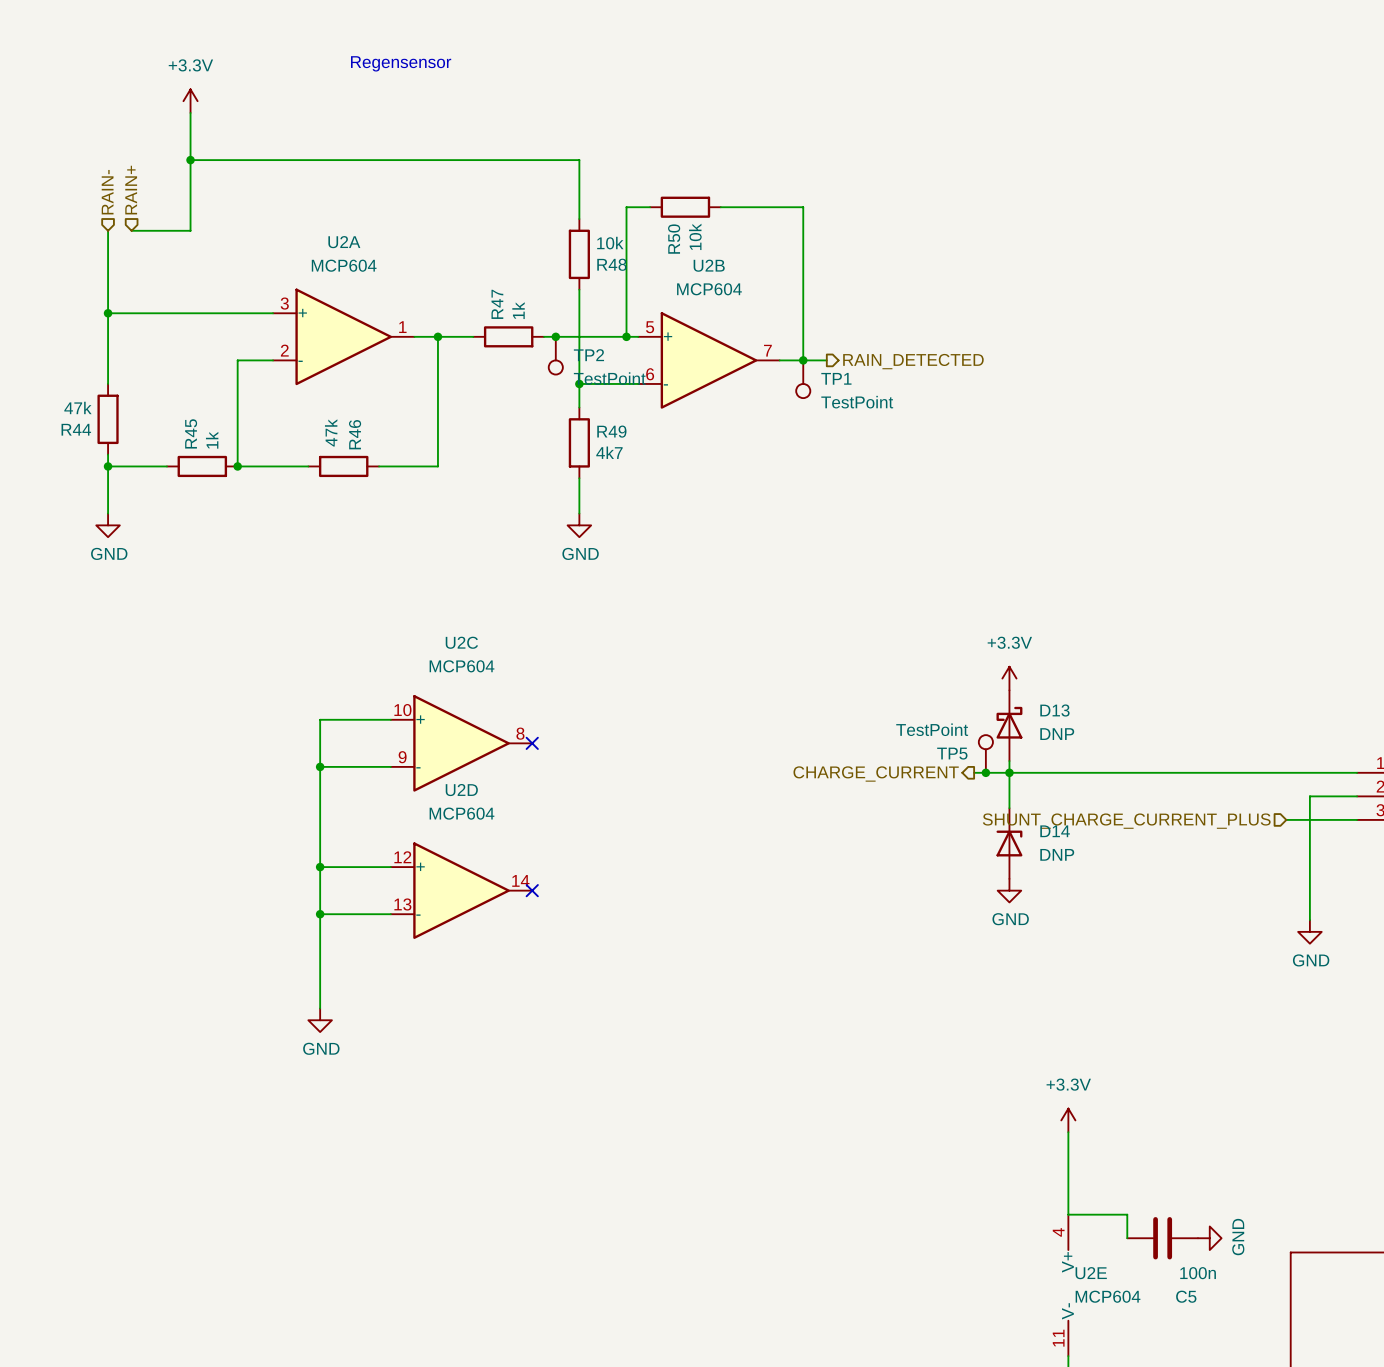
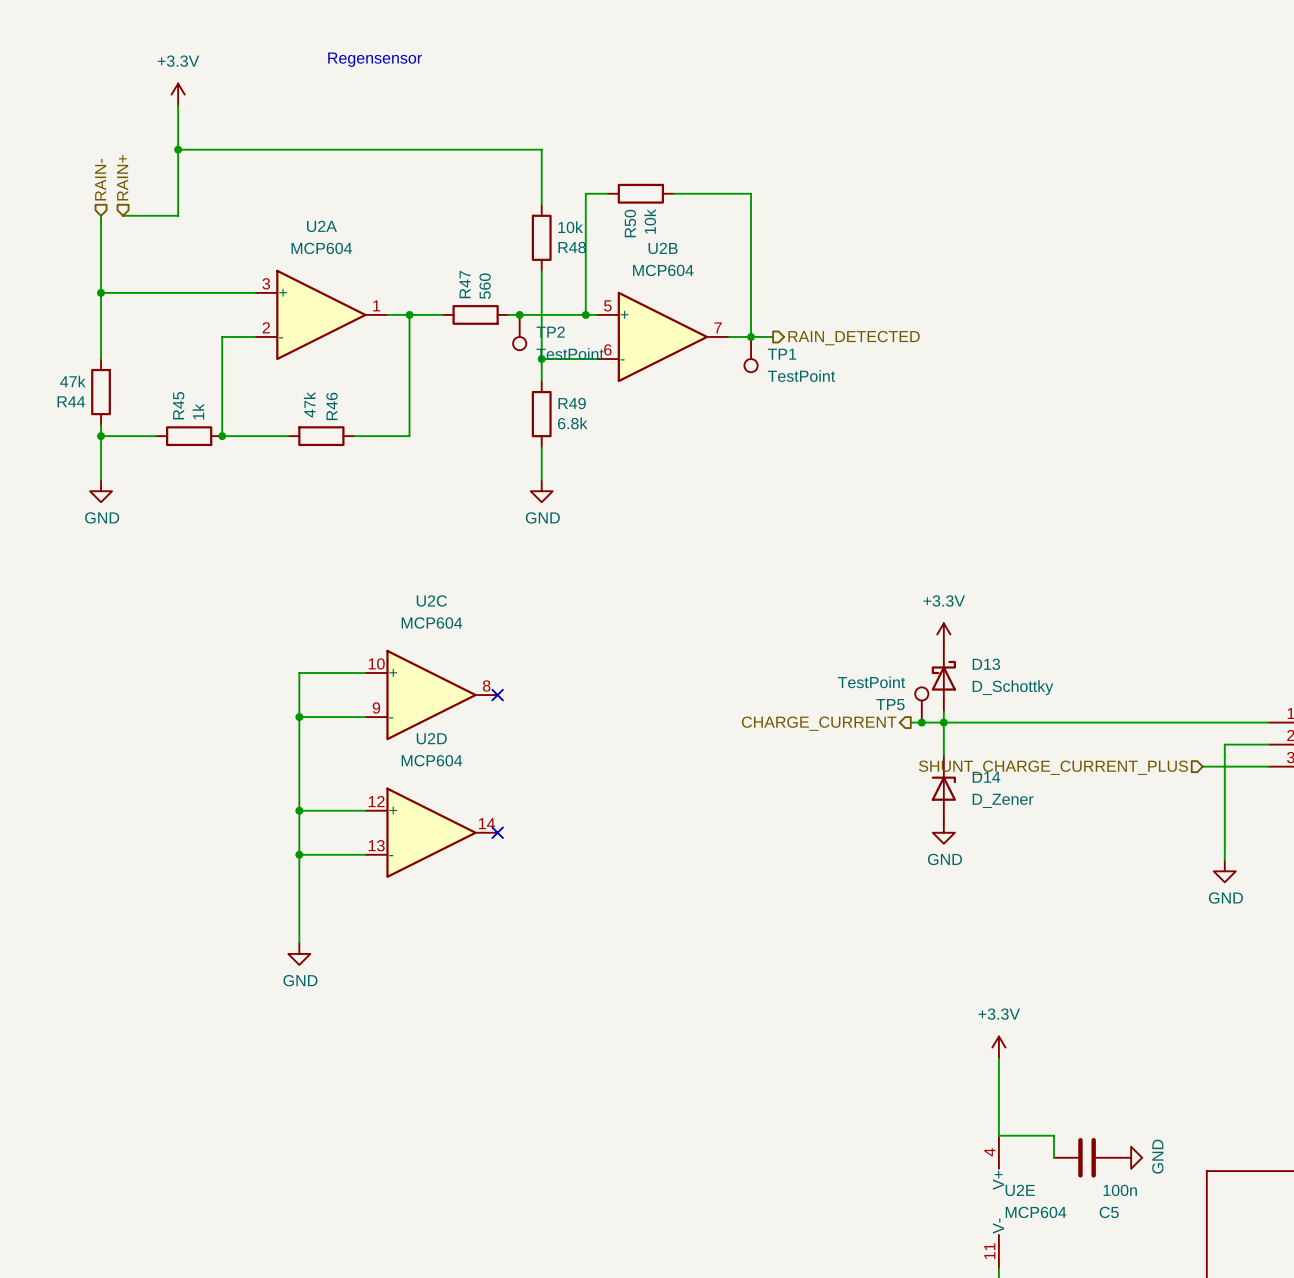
R47 value: 1k (518, 310) -> 560 (485, 286)
R49 value: 4k7 (609, 452) -> 6.8k (572, 423)
D13 value: DNP (1057, 734) -> D_Schottky (1012, 687)
D14 value: DNP (1057, 854) -> D_Zener (1003, 800)

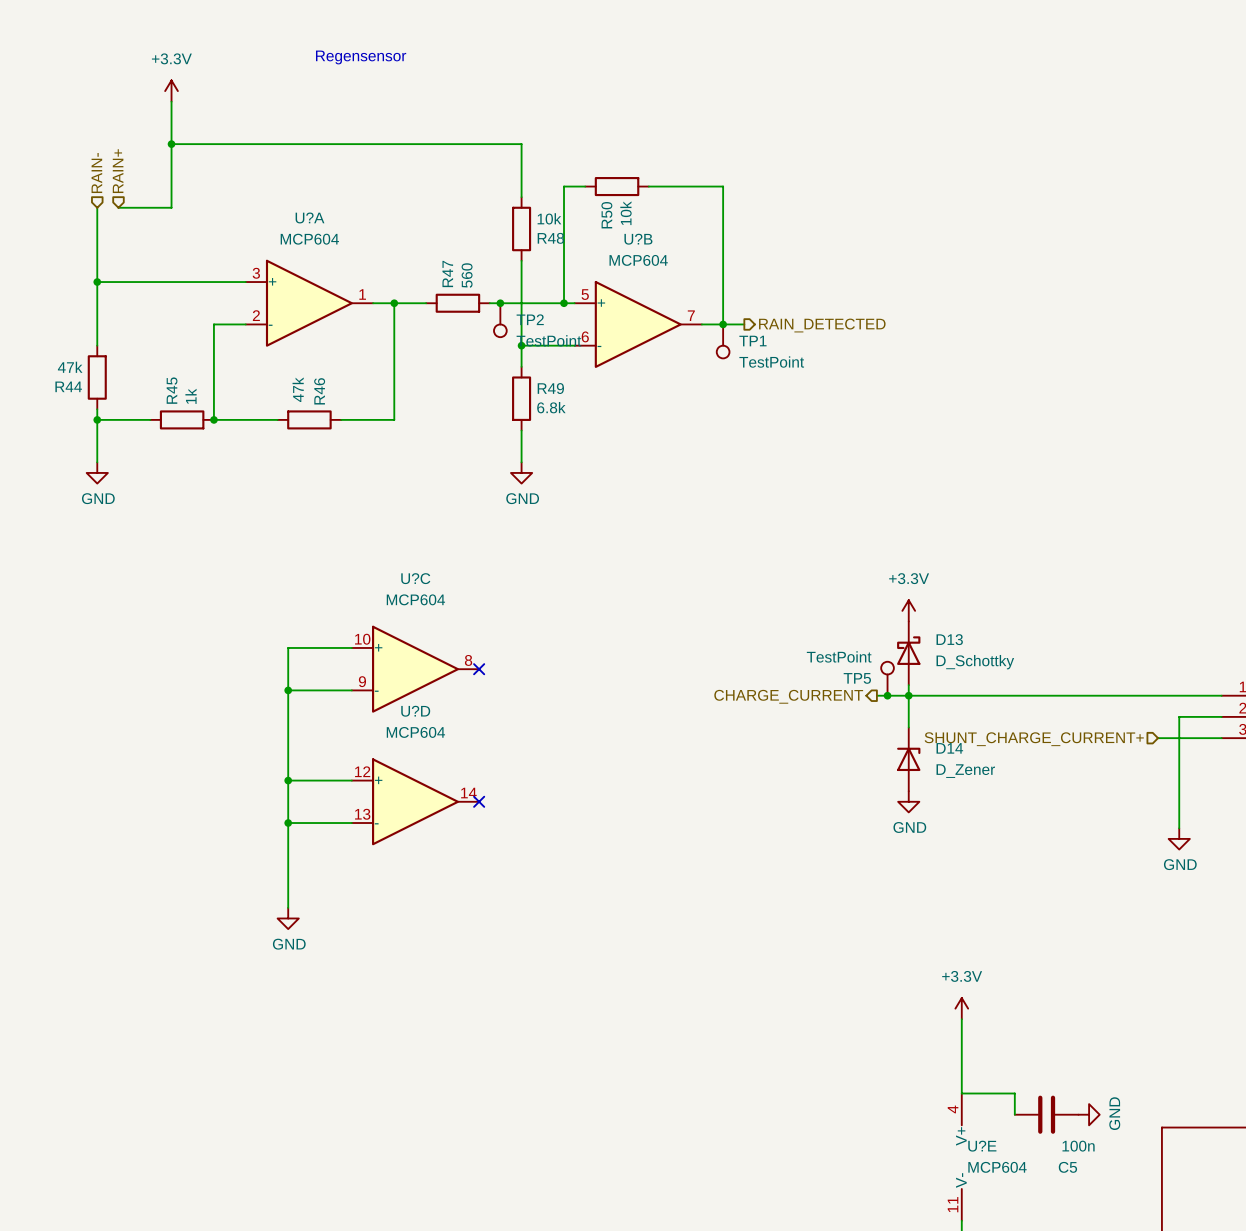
U2A name: U2A (321, 226) -> U?A (310, 217)
U2B name: U2B (663, 248) -> U?B (638, 239)
U2C name: U2C (431, 600) -> U?C (415, 578)
U2D name: U2D (431, 738) -> U?D (415, 711)
hierarchical label: SHUNT_CHARGE_CURRENT_PLUS (1053, 767) -> SHUNT_CHARGE_CURRENT+ (1034, 739)
U2E name: U2E (1020, 1190) -> U?E (982, 1146)

